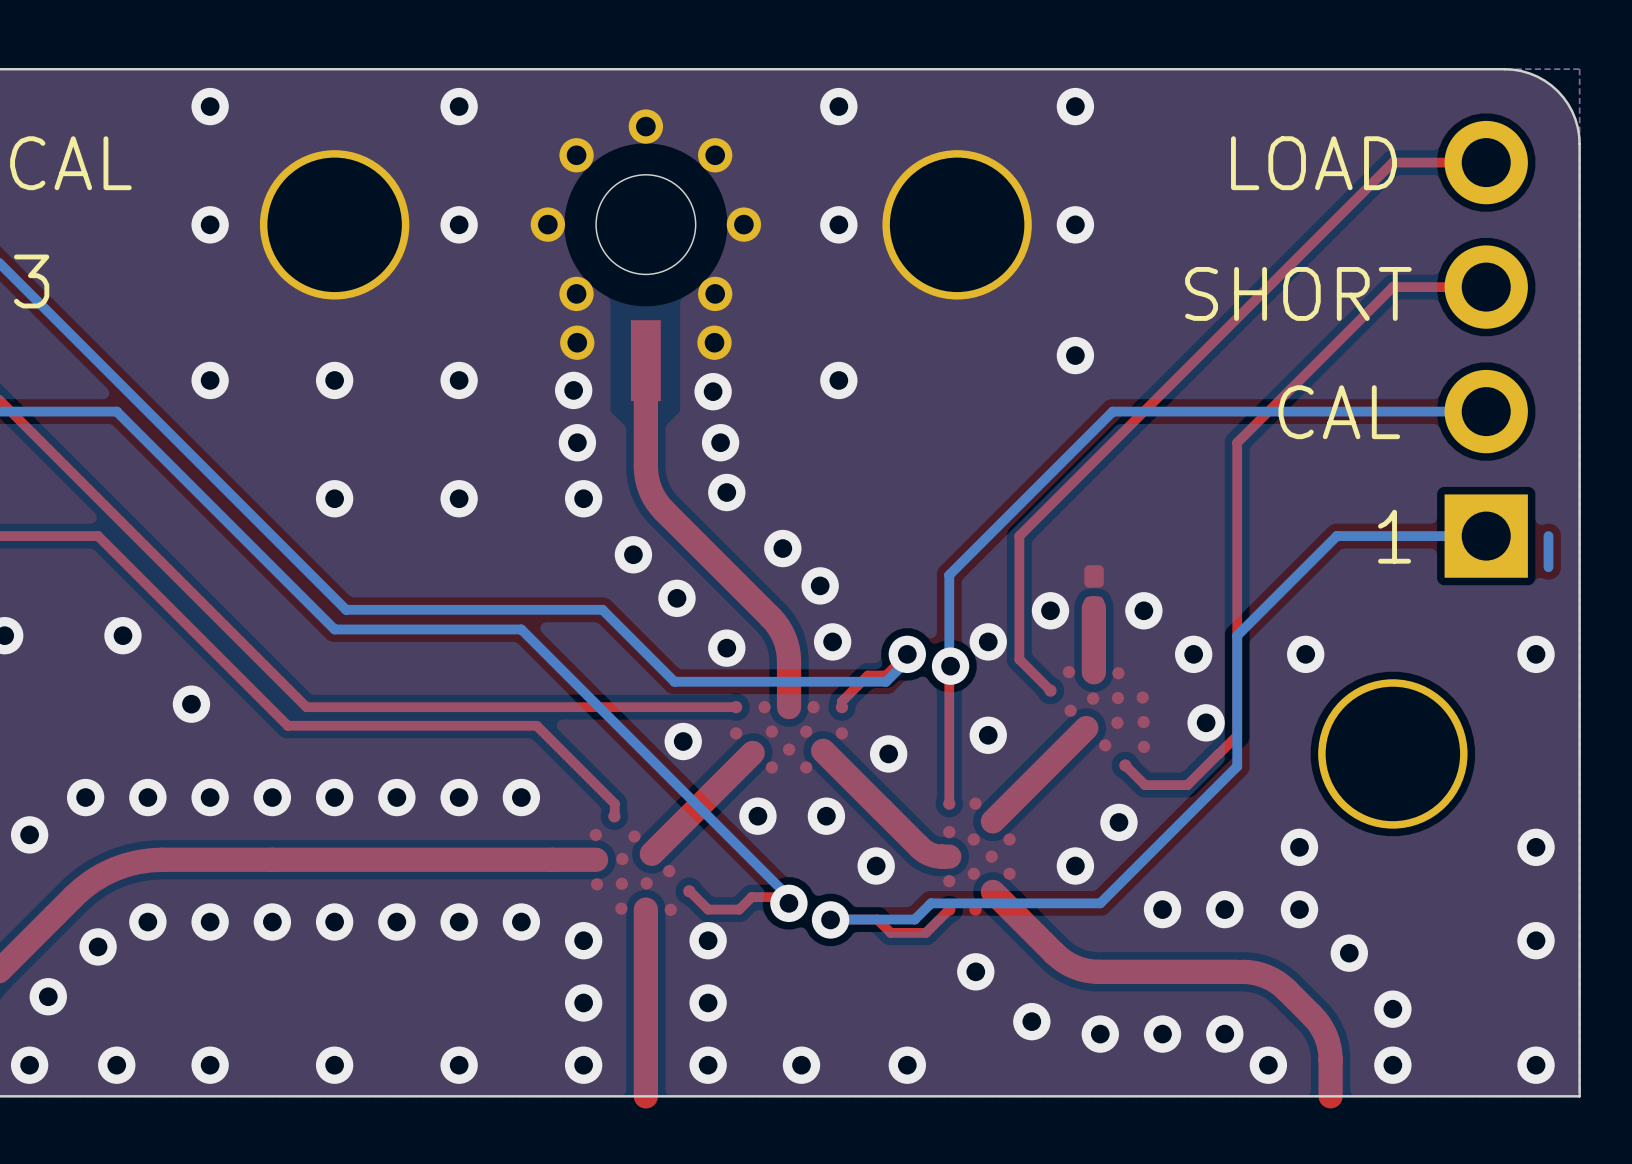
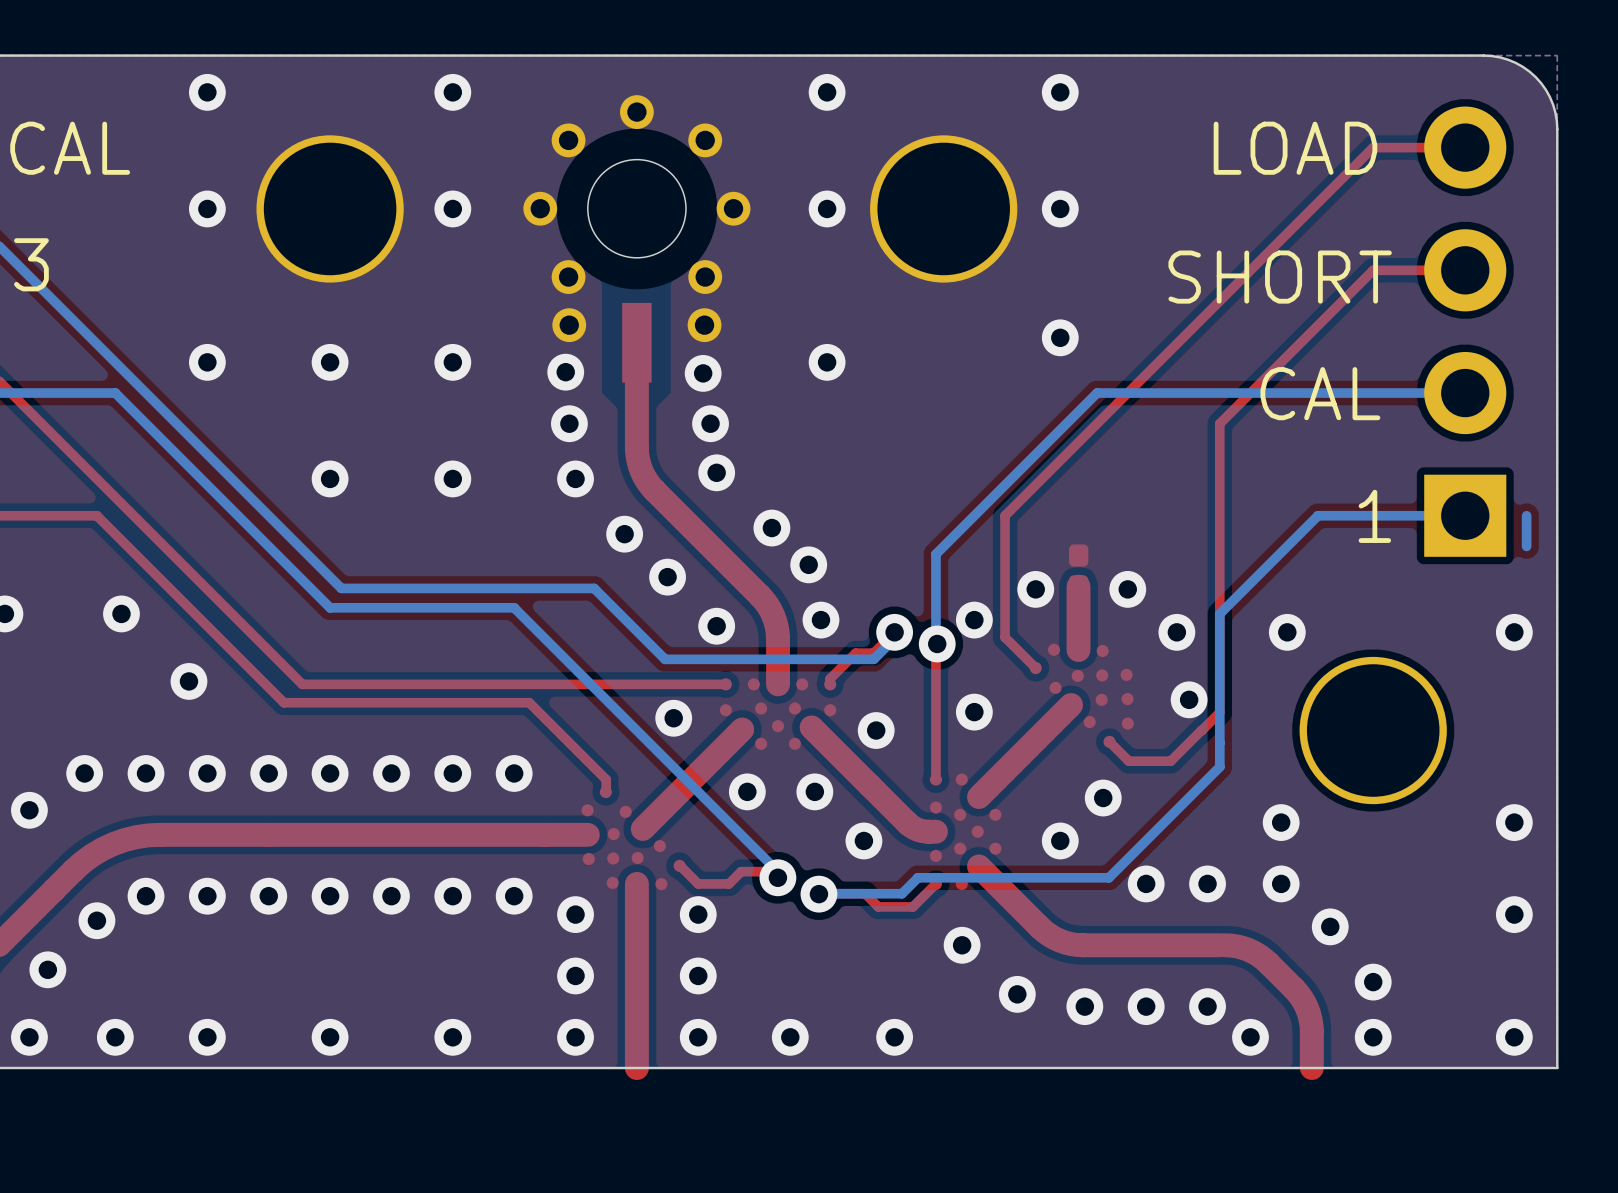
bottom track: (1237, 766) (1100, 903) -> (1219, 742) (1219, 766) (1108, 877) (1084, 877)

